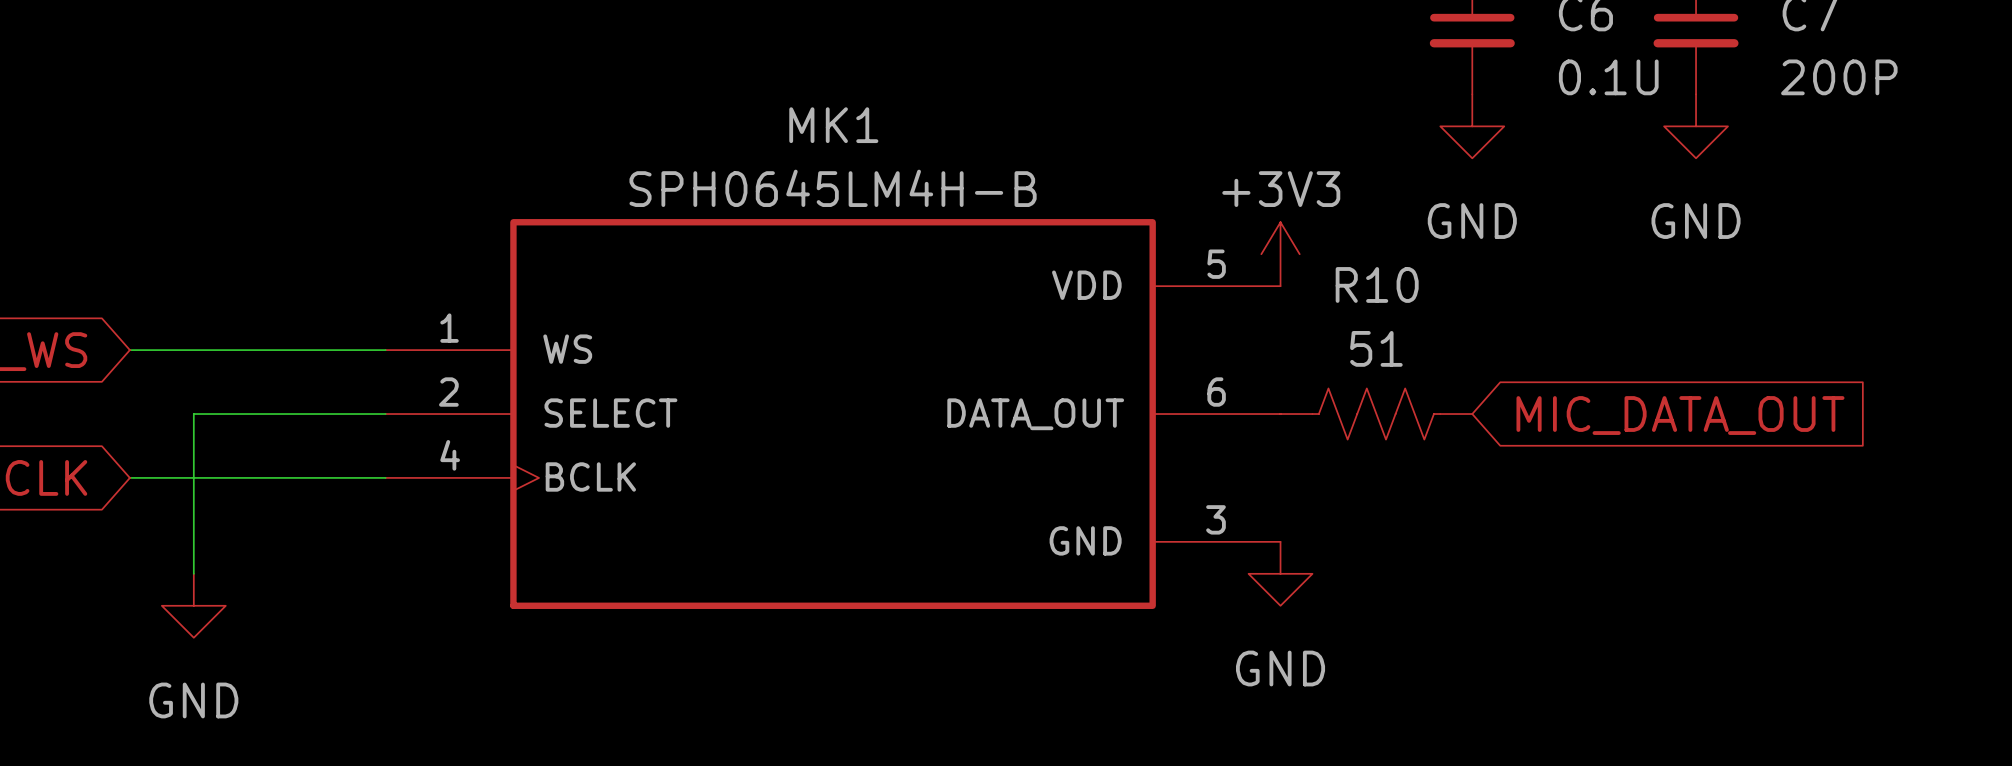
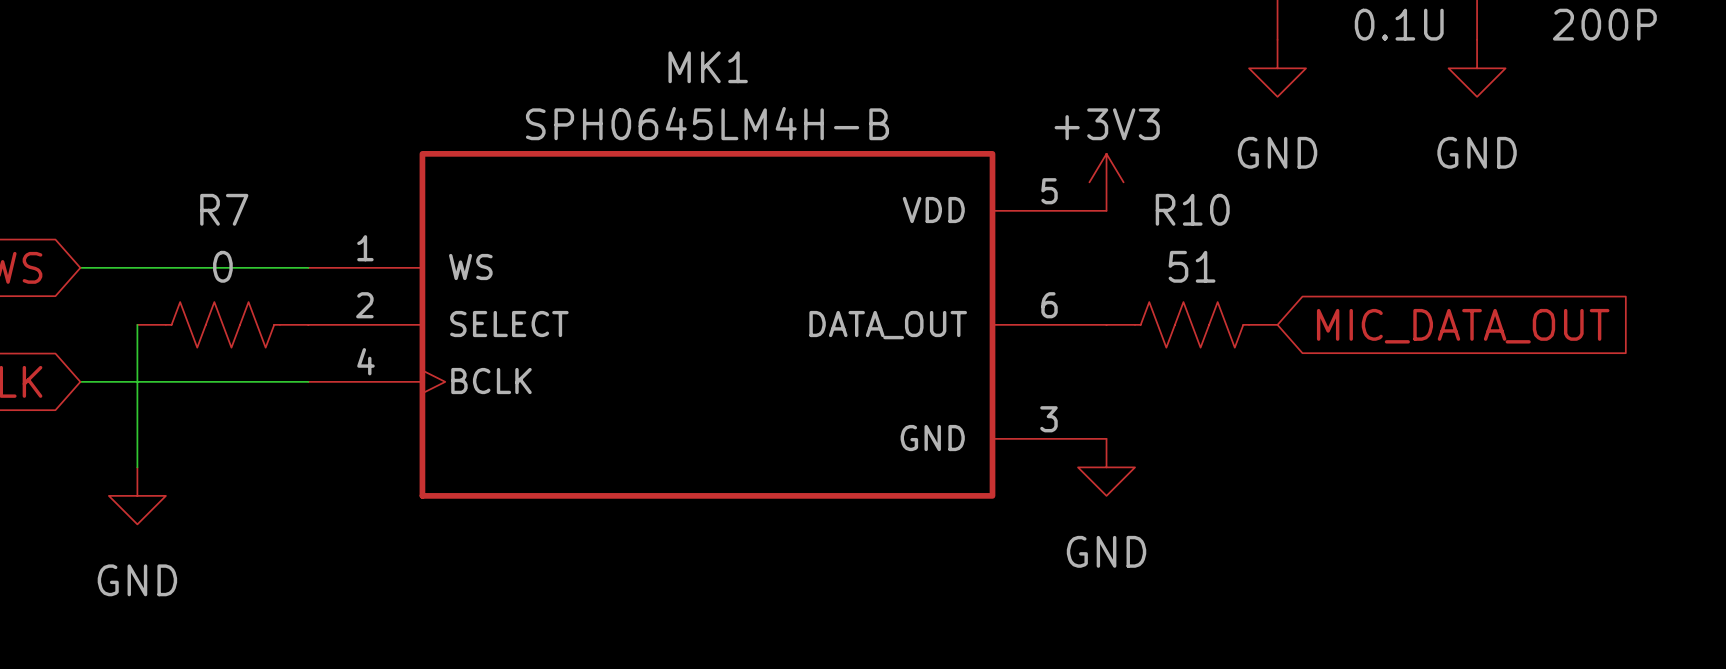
wire: (193, 414) (385, 414) -> none
R7: none -> 0 (222, 324)

